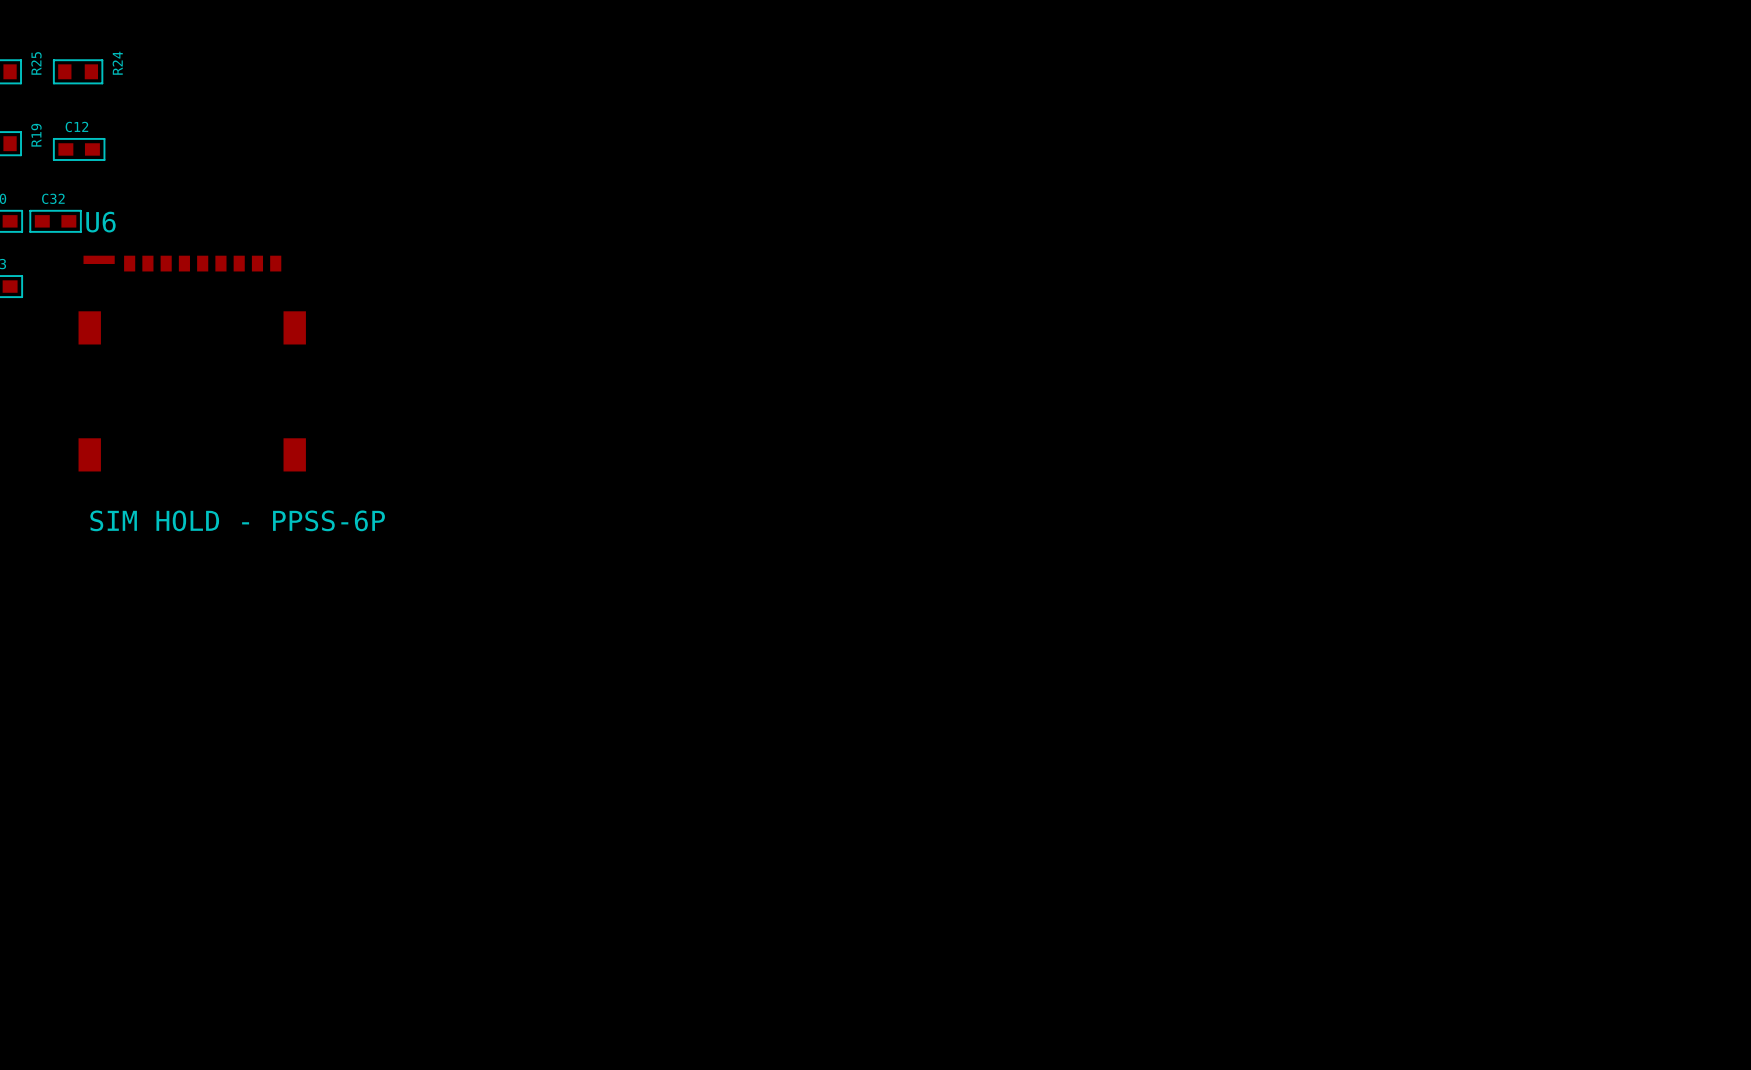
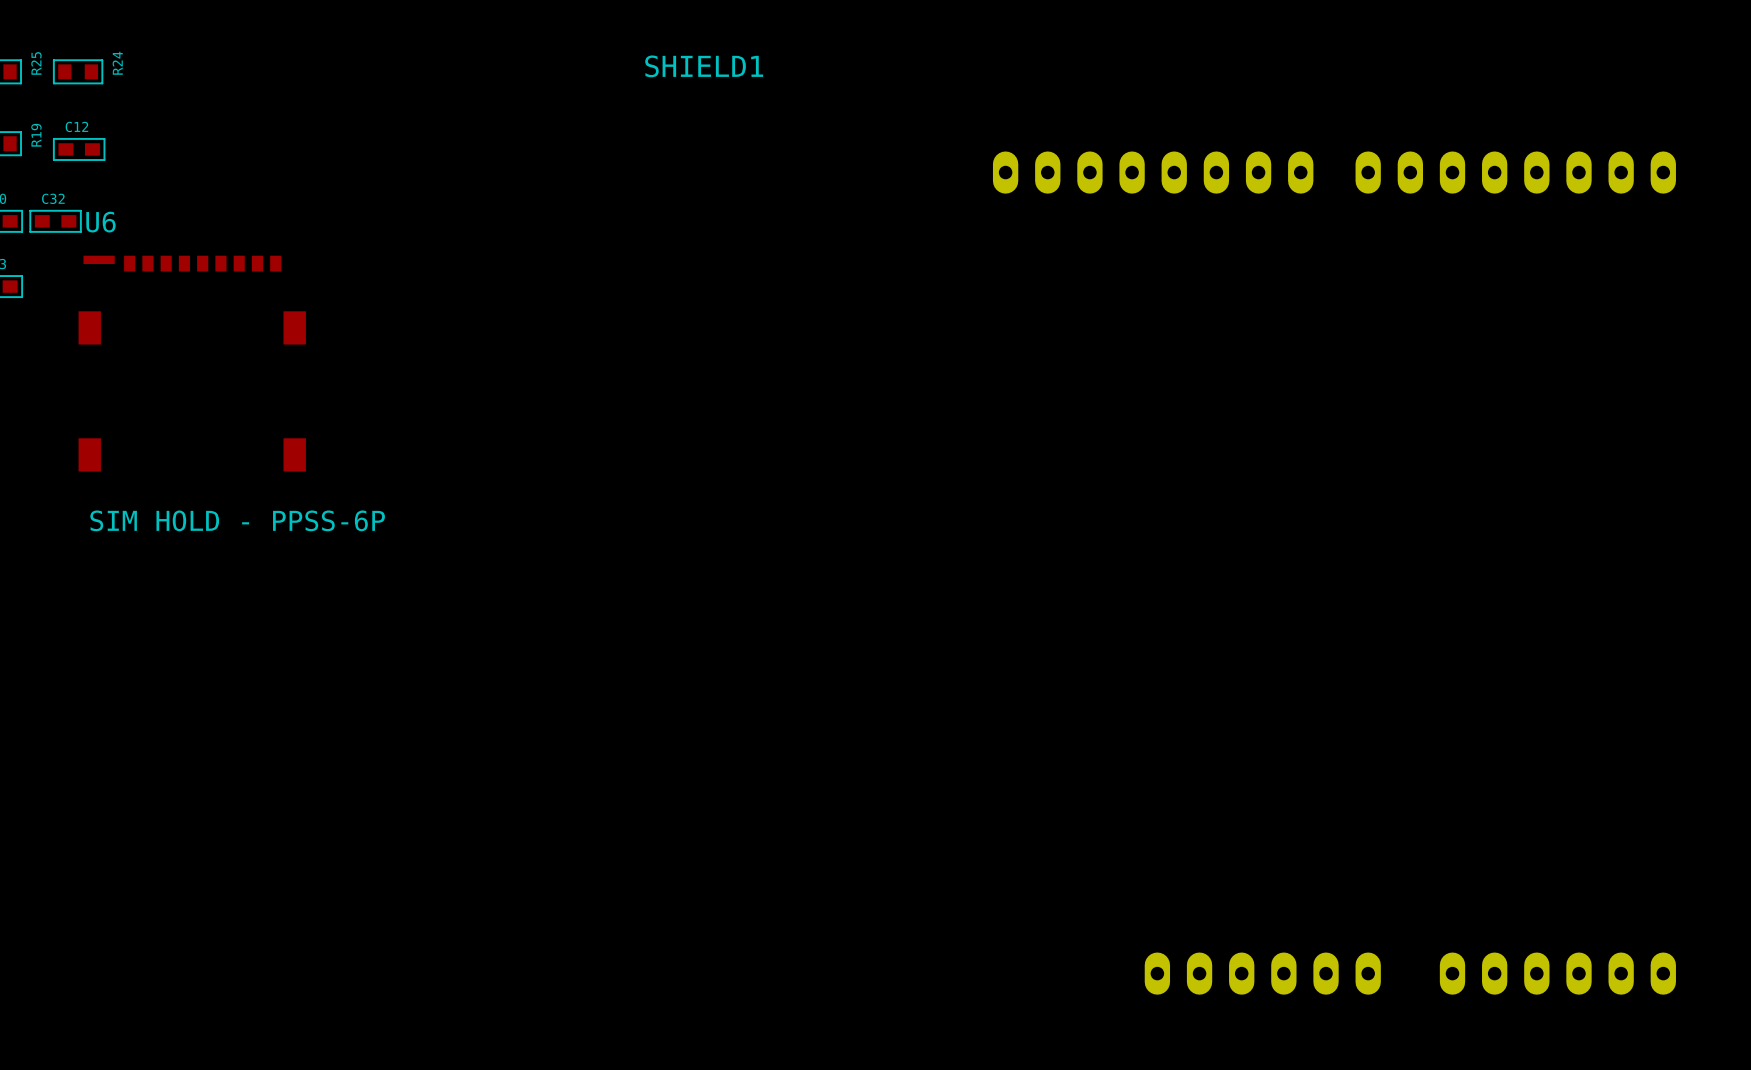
SHIELD1: none -> (1334, 573)

